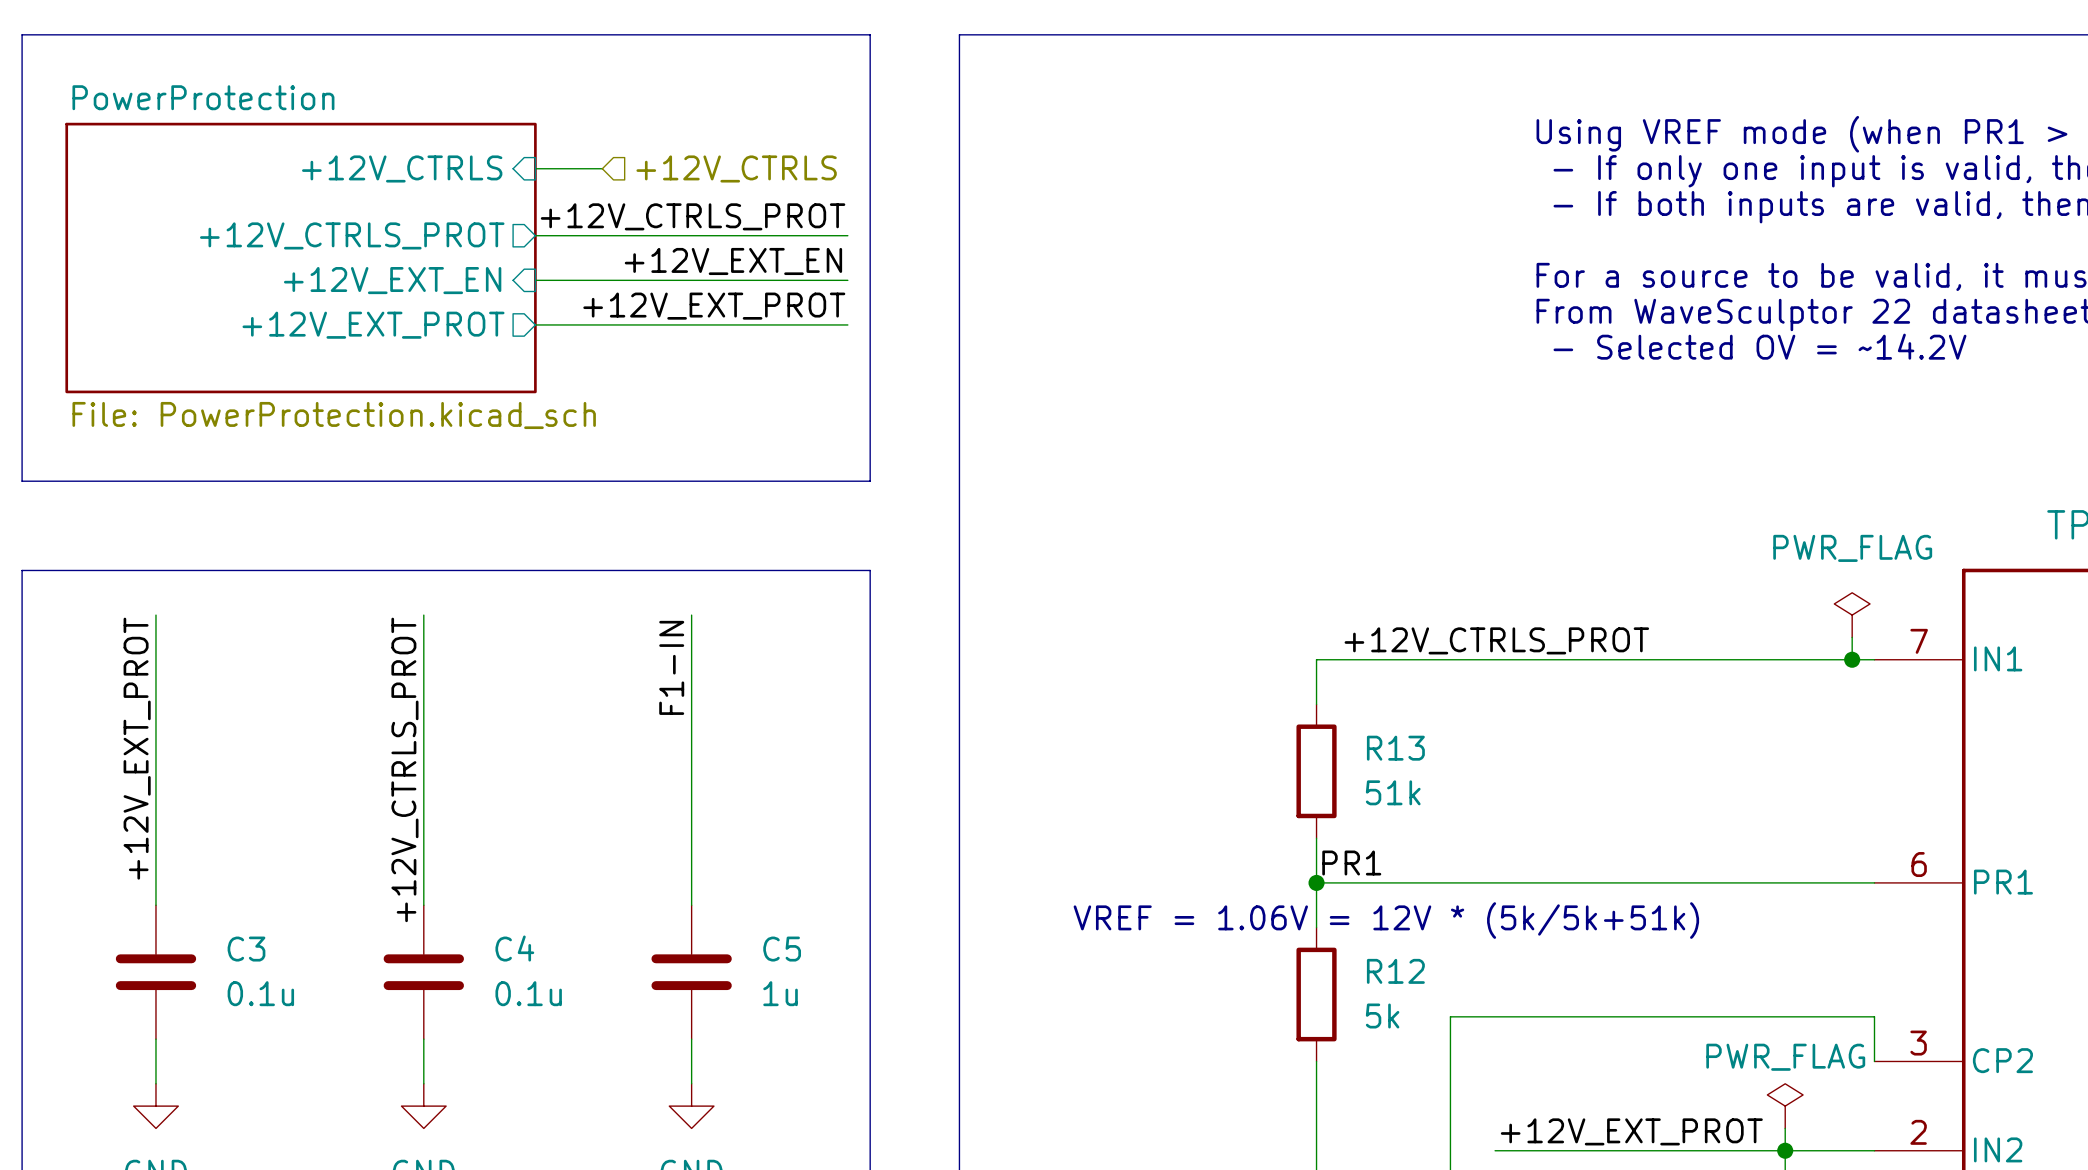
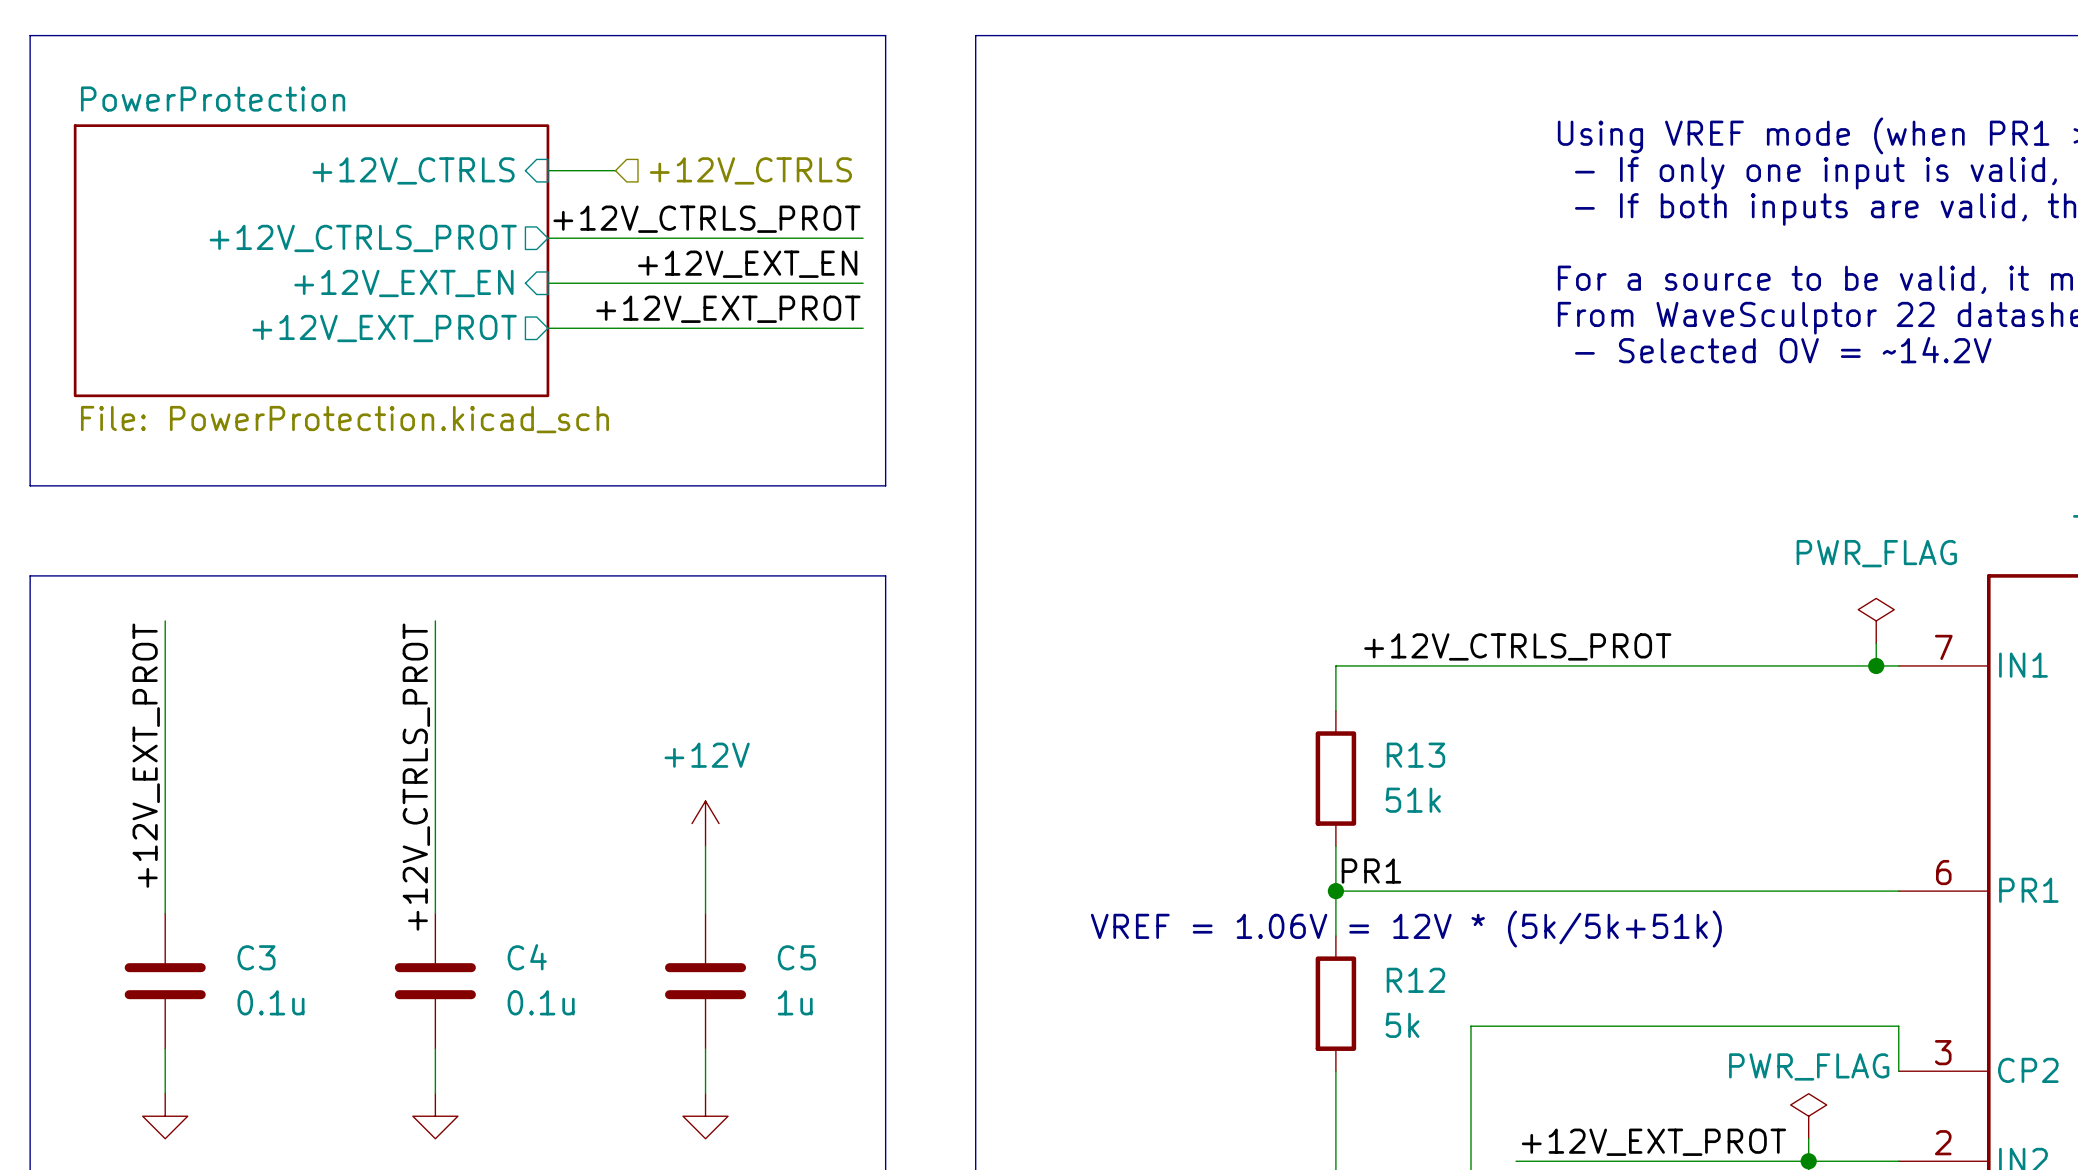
wire: (691, 615) (691, 838) -> none
label: F1-IN (671, 667) -> none
power symbol: none -> +12V (705, 823)

